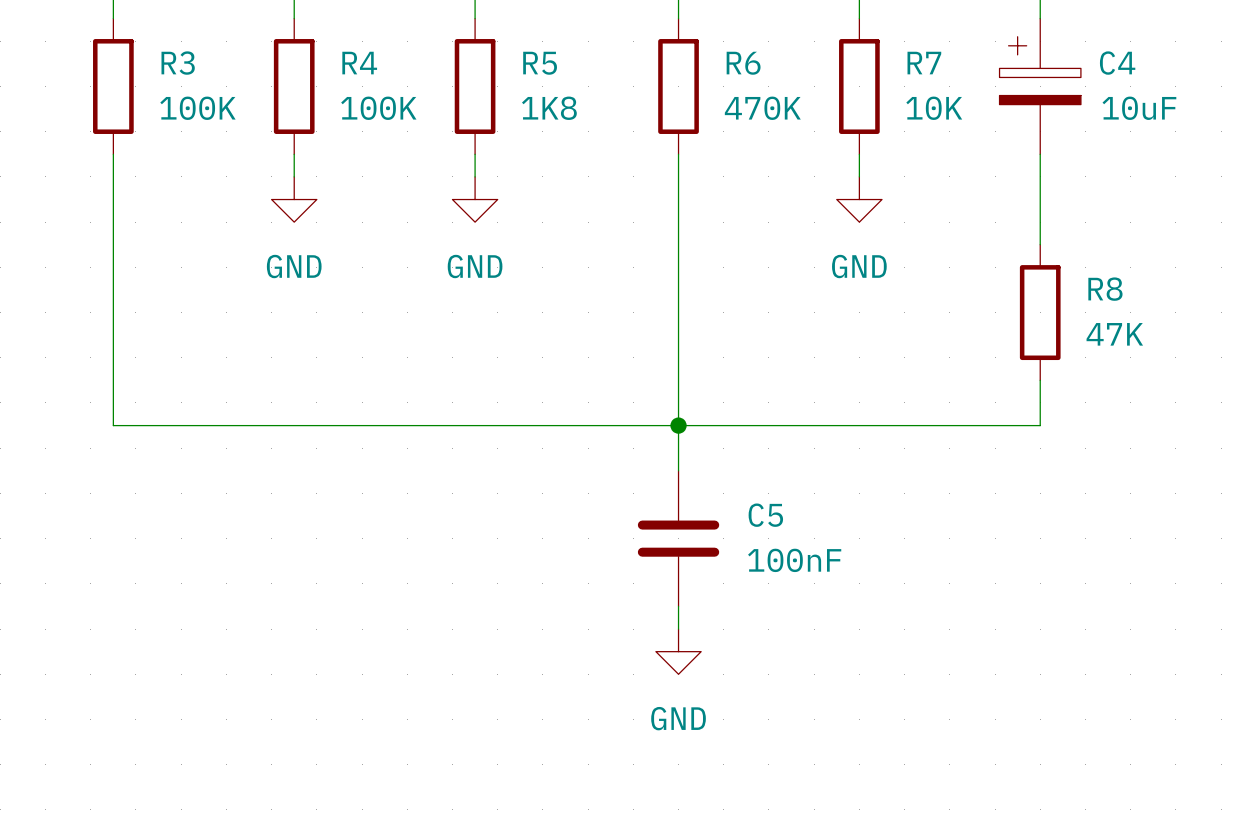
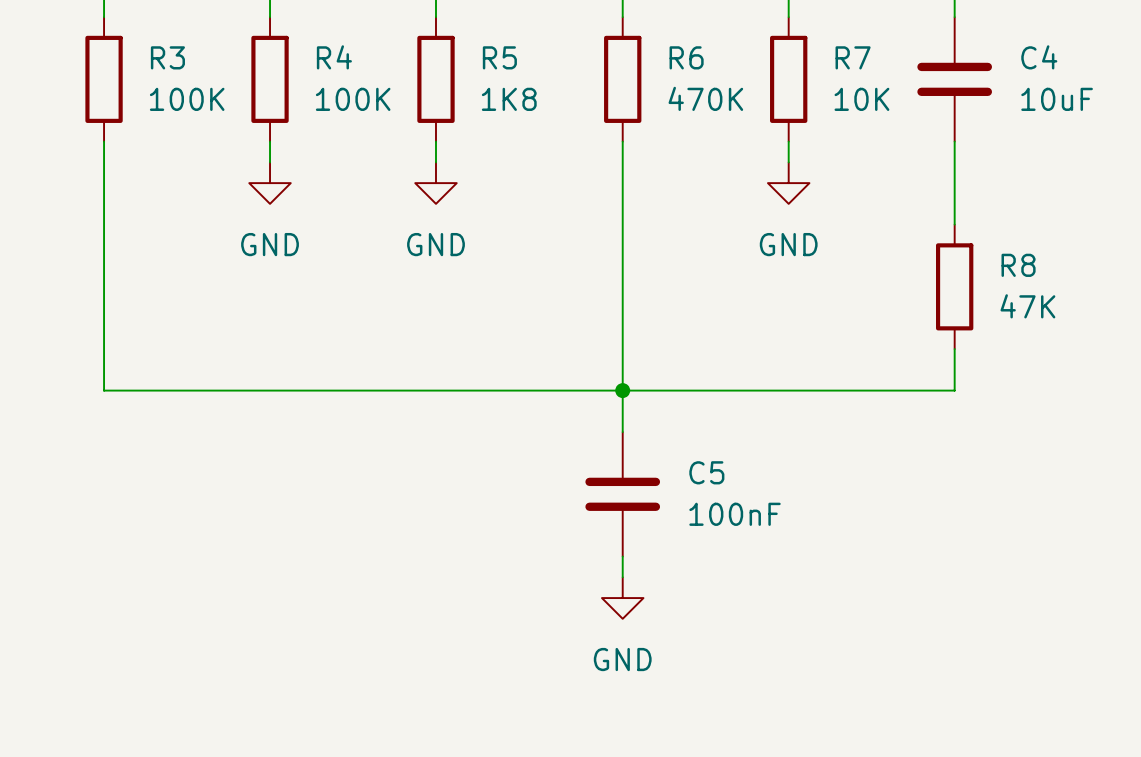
C4 symbol: [999, 18, 1081, 155] -> [917, 17, 993, 142]

